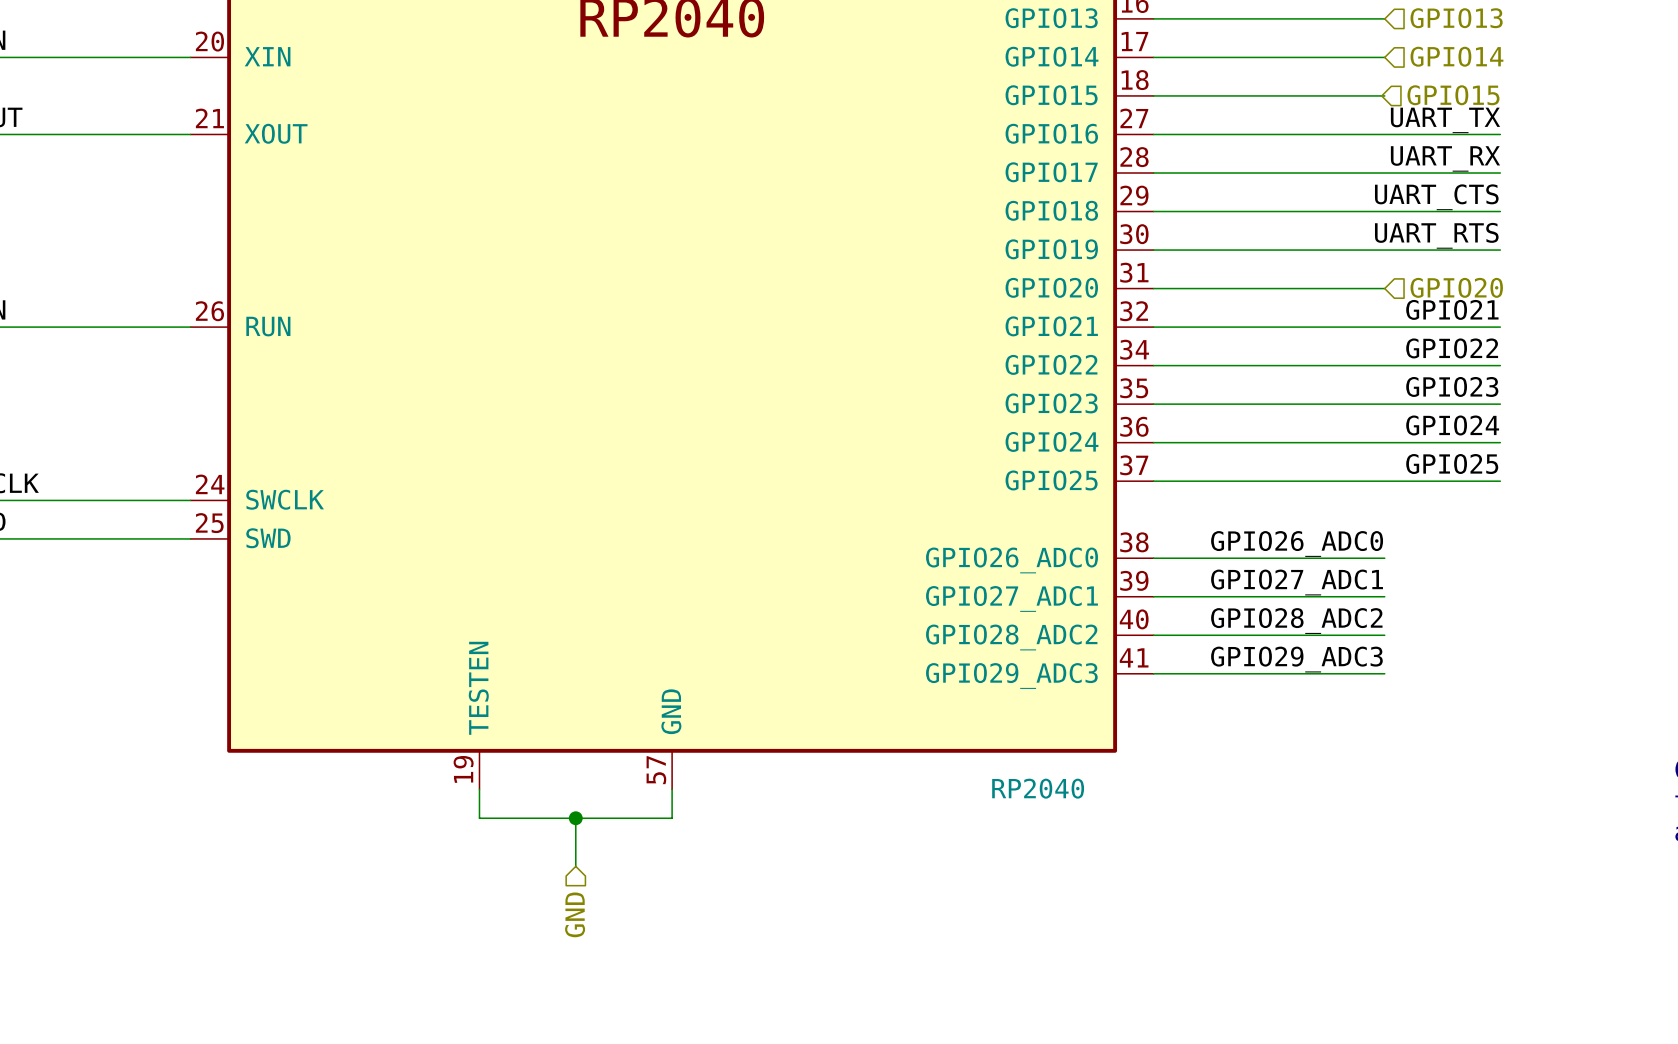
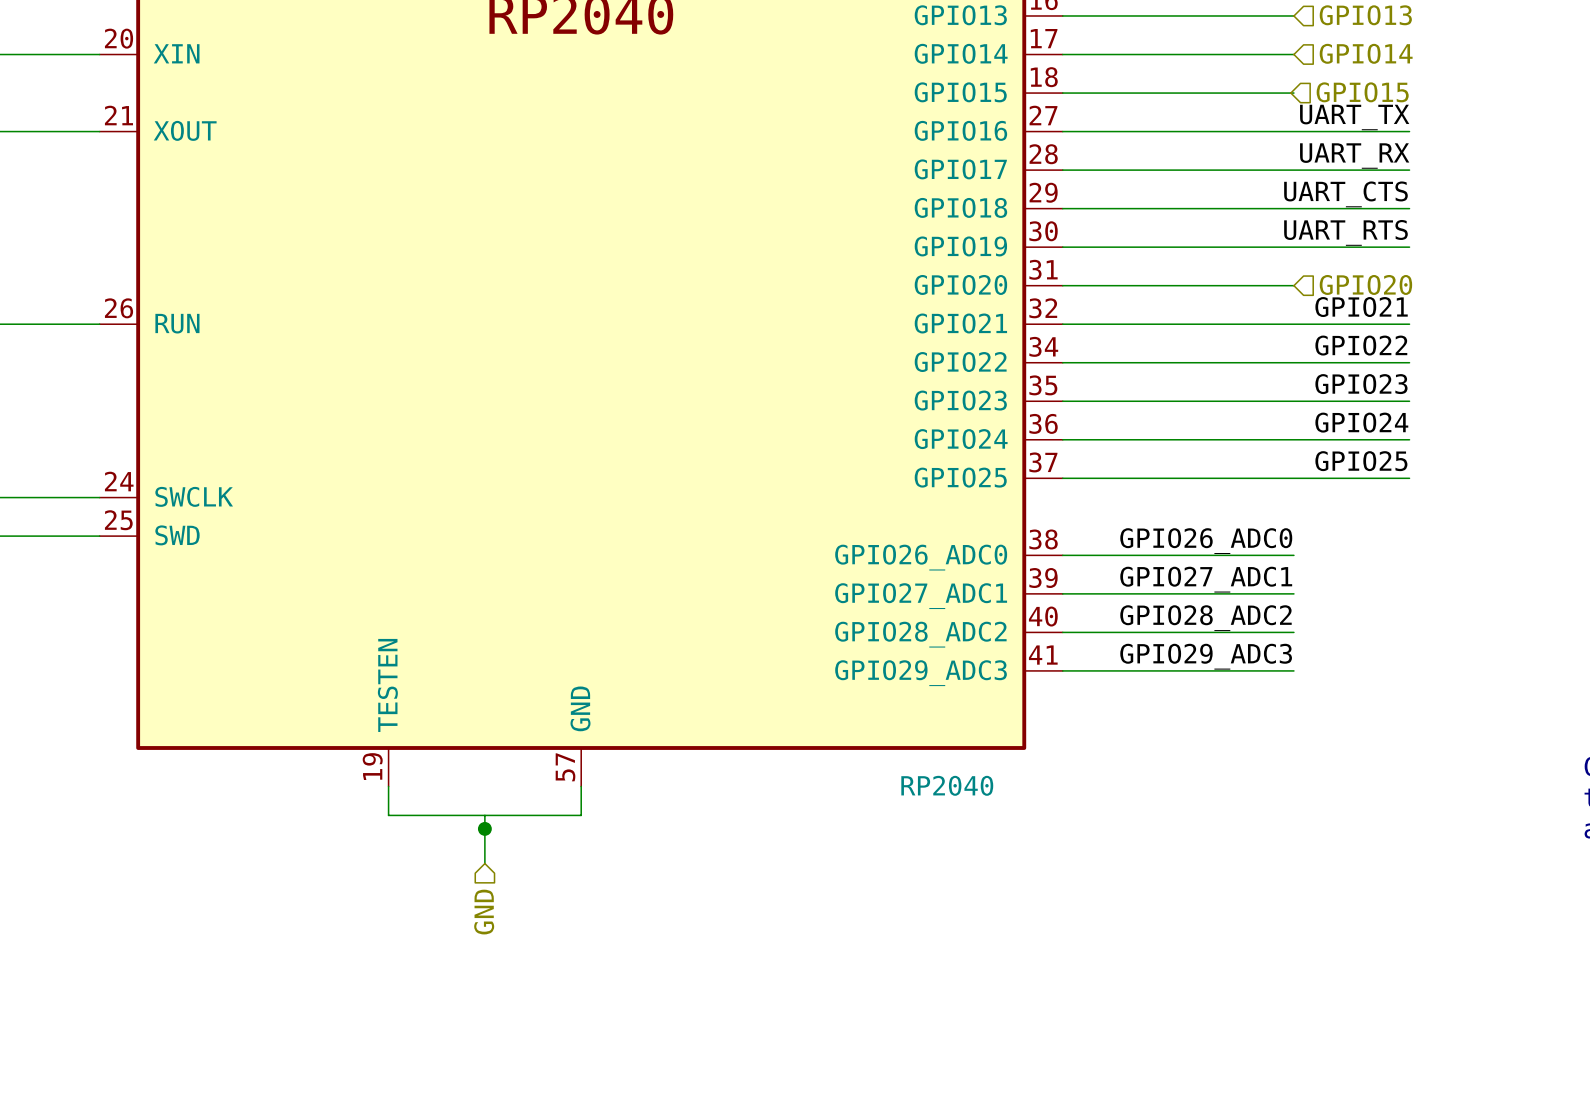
junction position: (575, 818) -> (484, 828)

